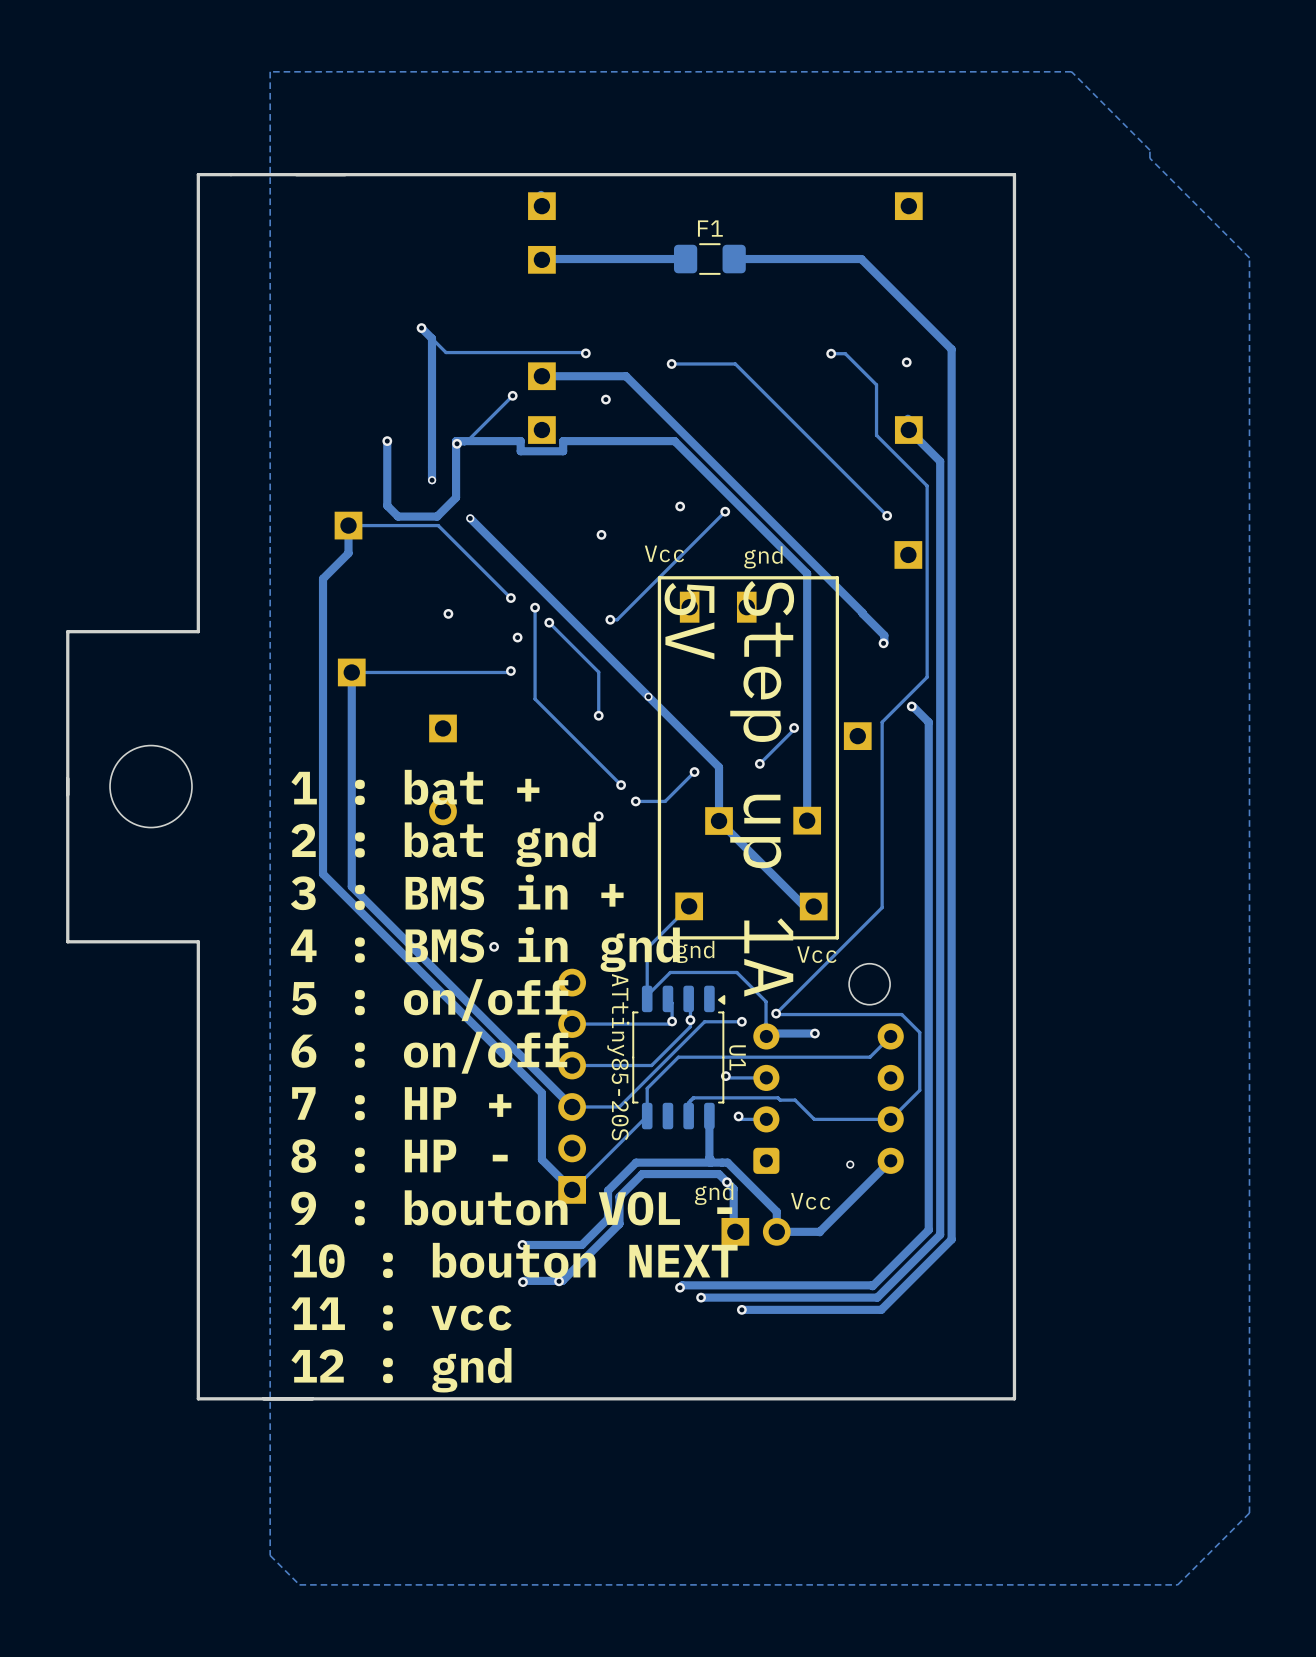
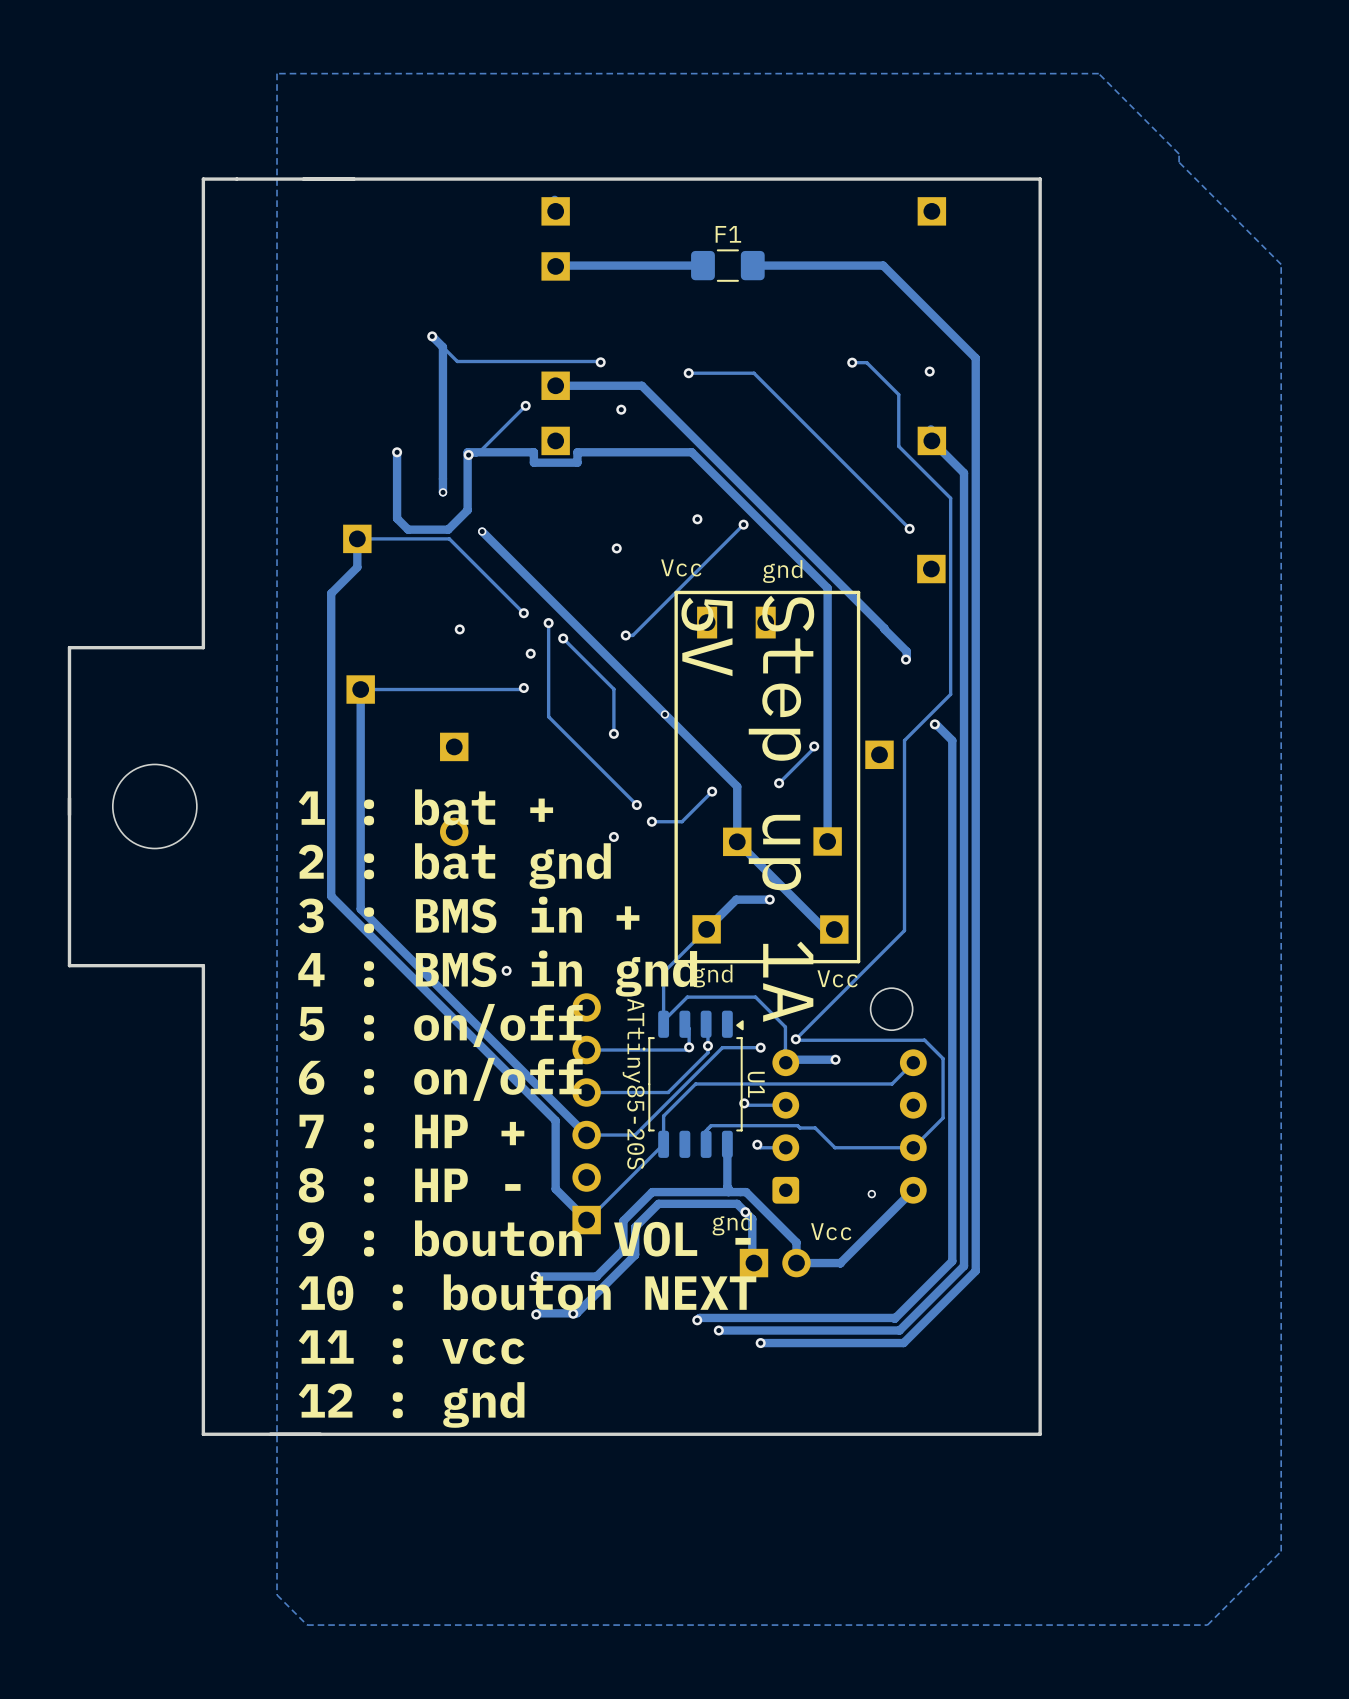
track: none -> (769, 899) (736, 899) (706, 929)
via: none -> (769, 899)

